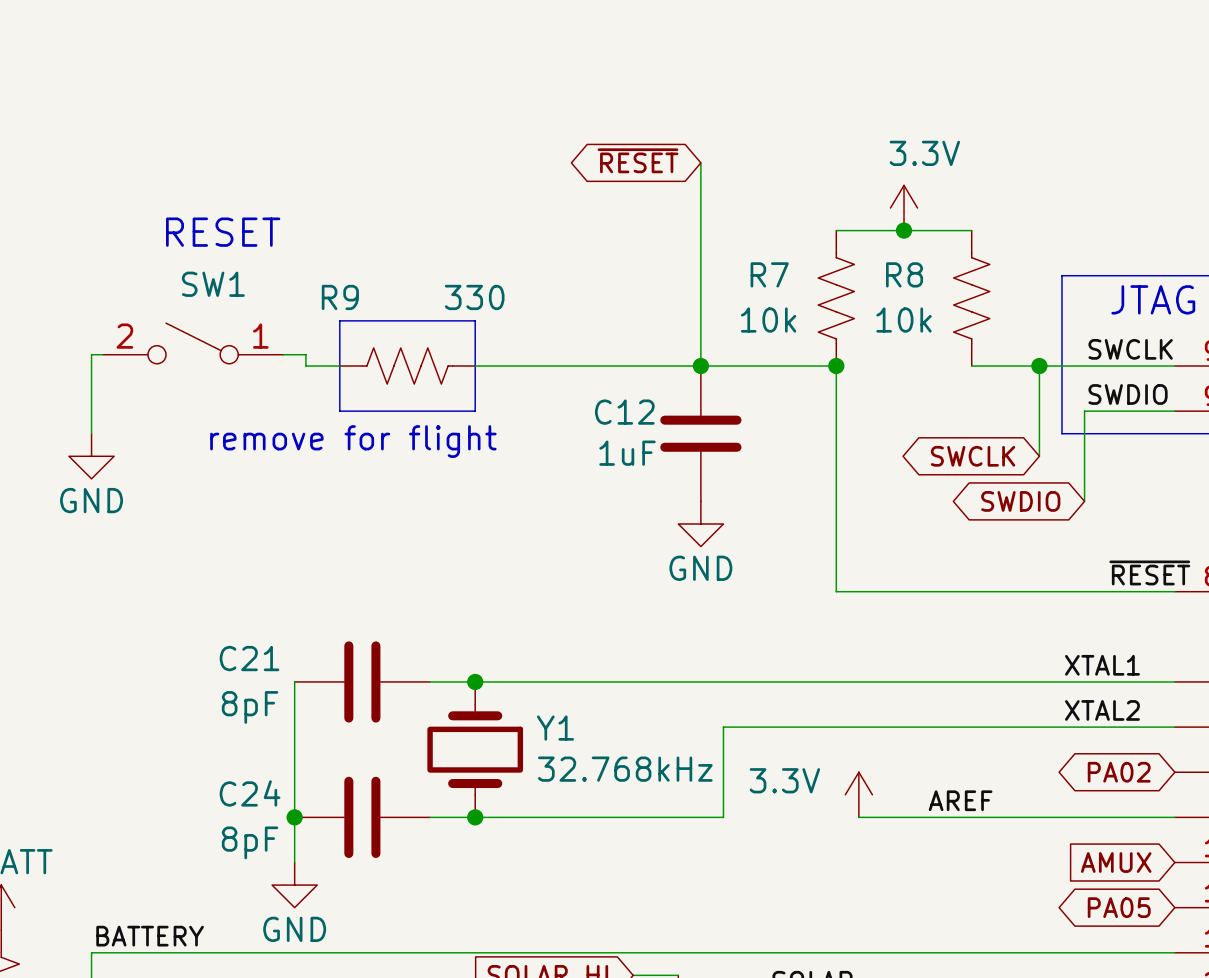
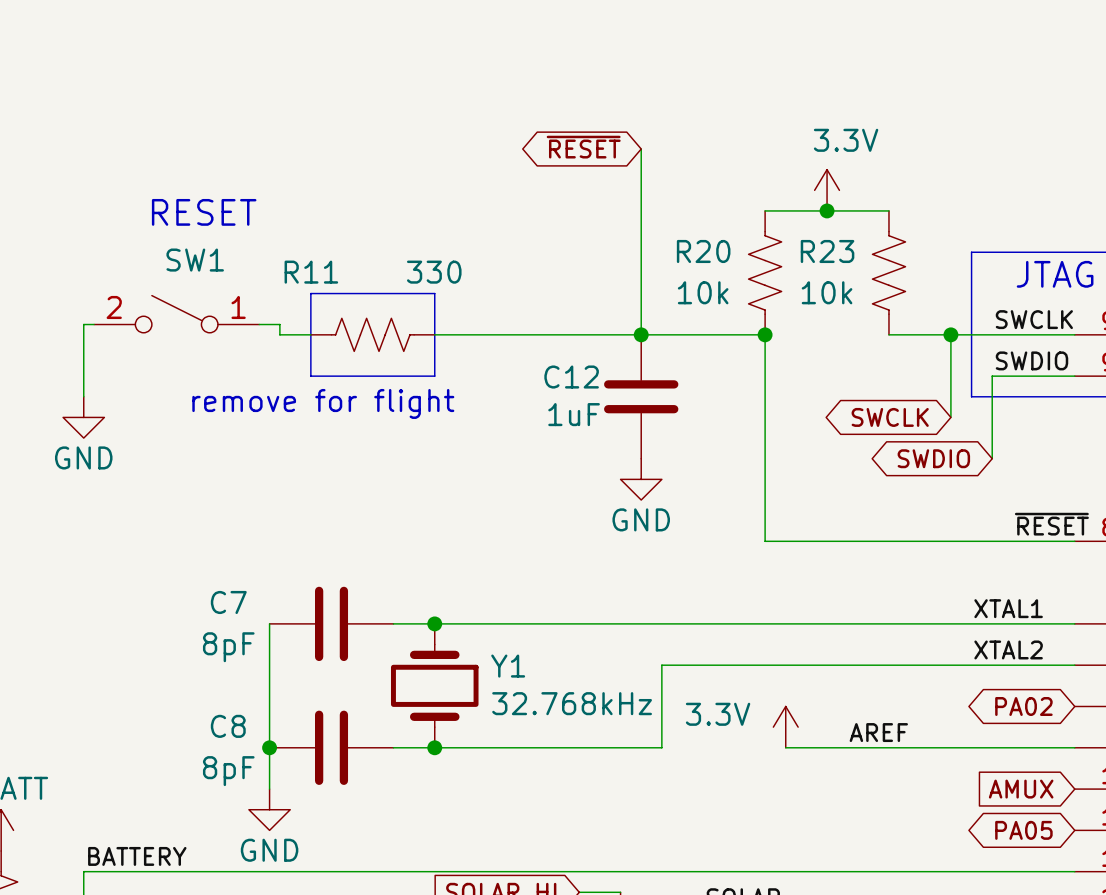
R7 name: R7 (769, 274) -> R20 (703, 251)
R8 name: R8 (904, 274) -> R23 (827, 251)
R9 name: R9 (340, 297) -> R11 (311, 272)
C21 name: C21 (249, 658) -> C7 (228, 602)
C24 name: C24 (250, 793) -> C8 (228, 726)

